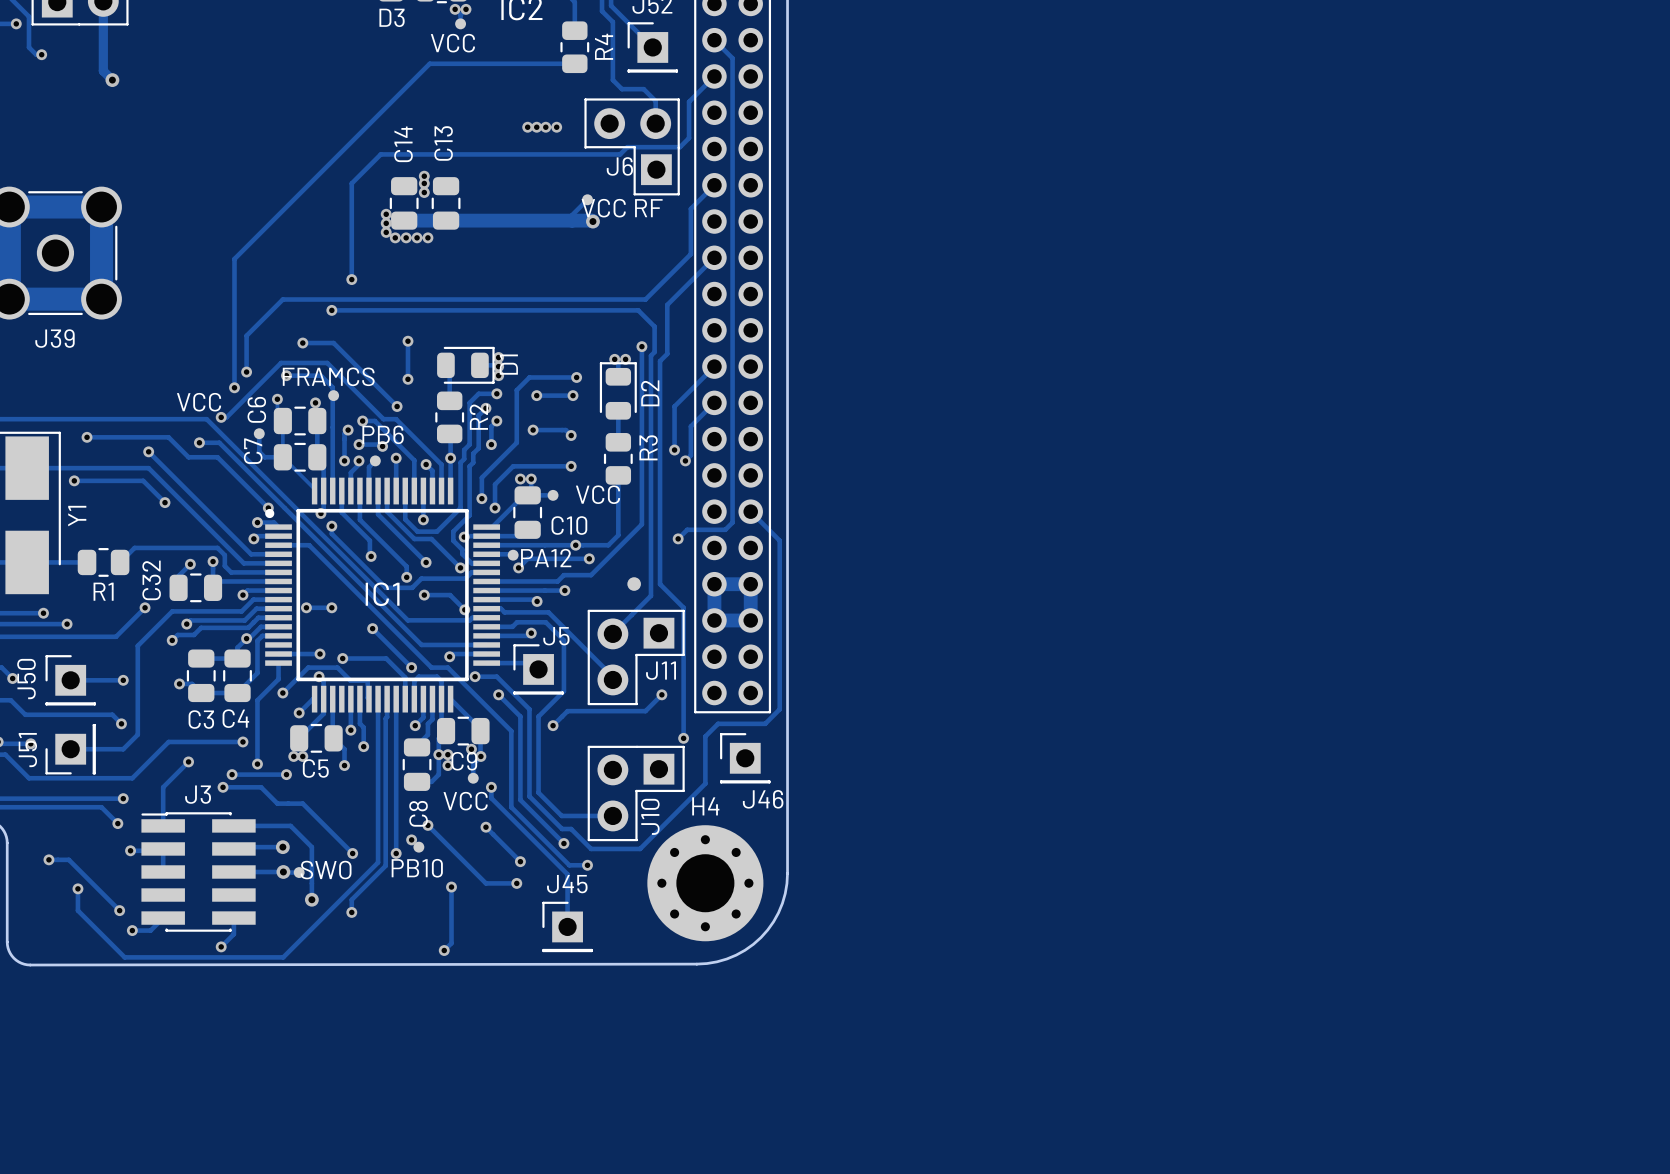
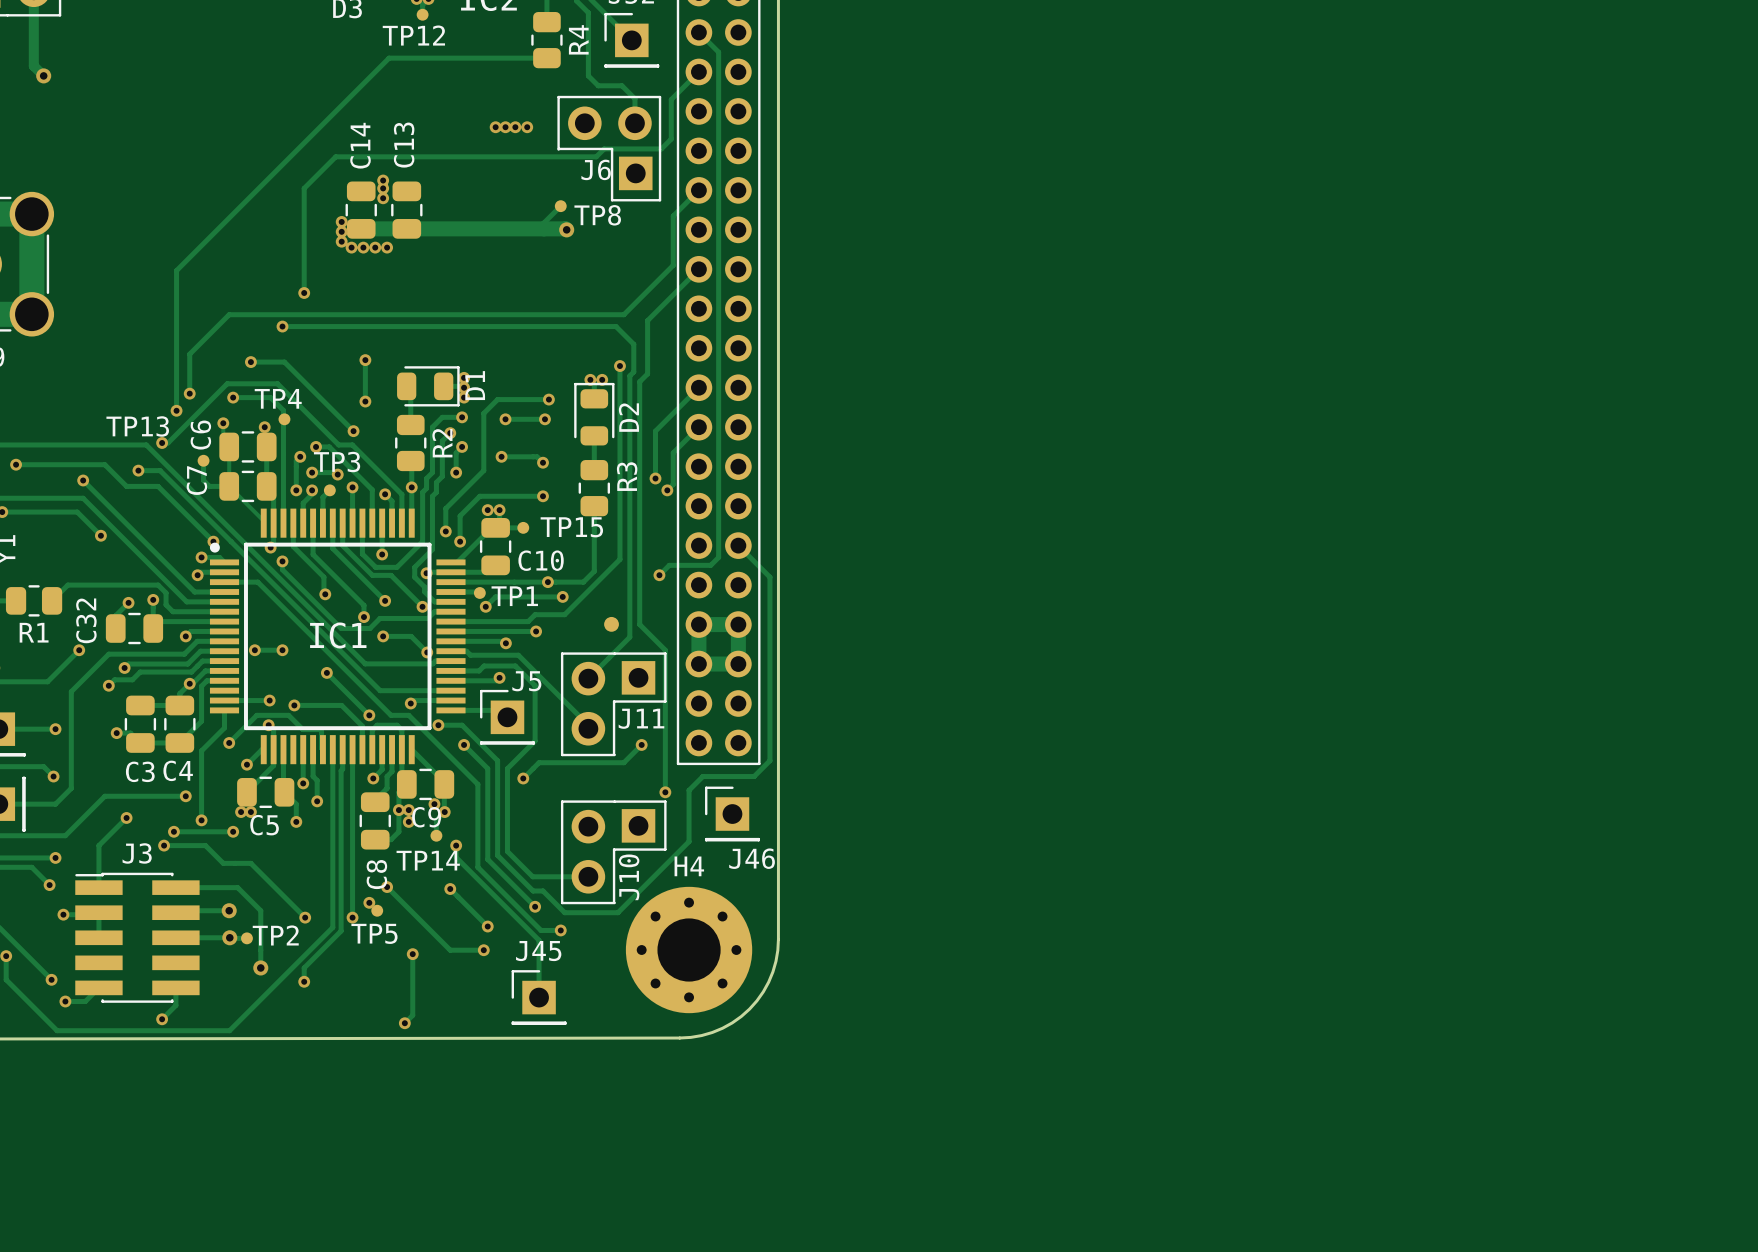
VCC name: VCC (452, 43) -> TP12 (413, 35)
VCC RF name: VCC RF (622, 208) -> TP8 (597, 215)
FRAMCS name: FRAMCS (328, 376) -> TP4 (278, 398)
VCC name: VCC (199, 402) -> TP13 (137, 426)
PB6 name: PB6 (383, 434) -> TP3 (337, 462)
VCC name: VCC (598, 494) -> TP15 (571, 527)
PA12 name: PA12 (546, 558) -> TP1 (514, 596)
VCC name: VCC (465, 801) -> TP14 (428, 860)
PB10 name: PB10 (417, 868) -> TP5 (374, 933)
SWO name: SWO (326, 870) -> TP2 (275, 935)

